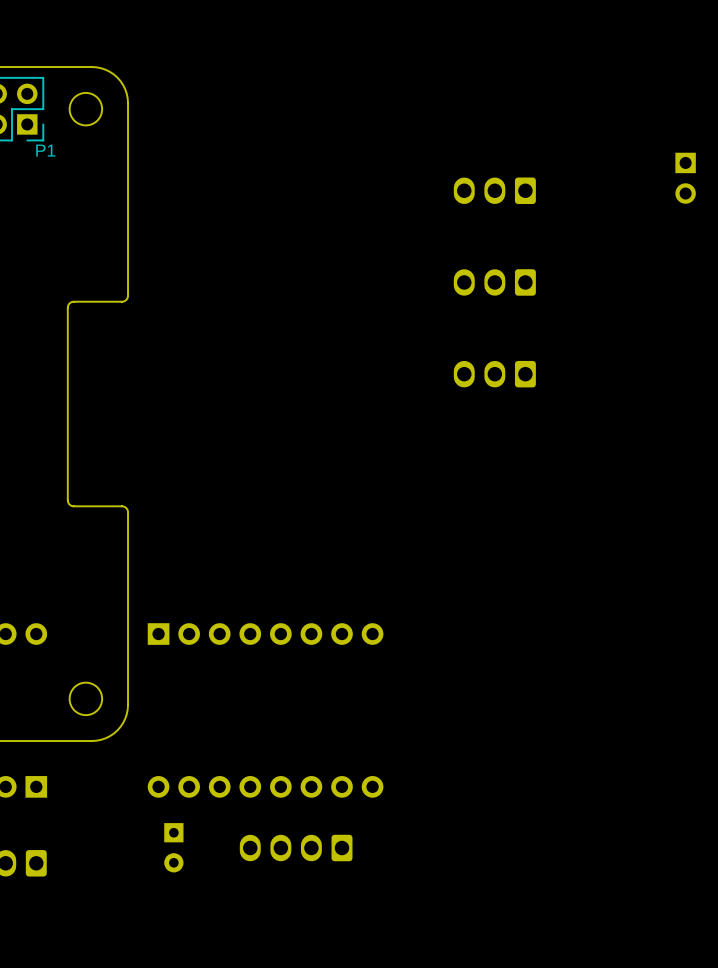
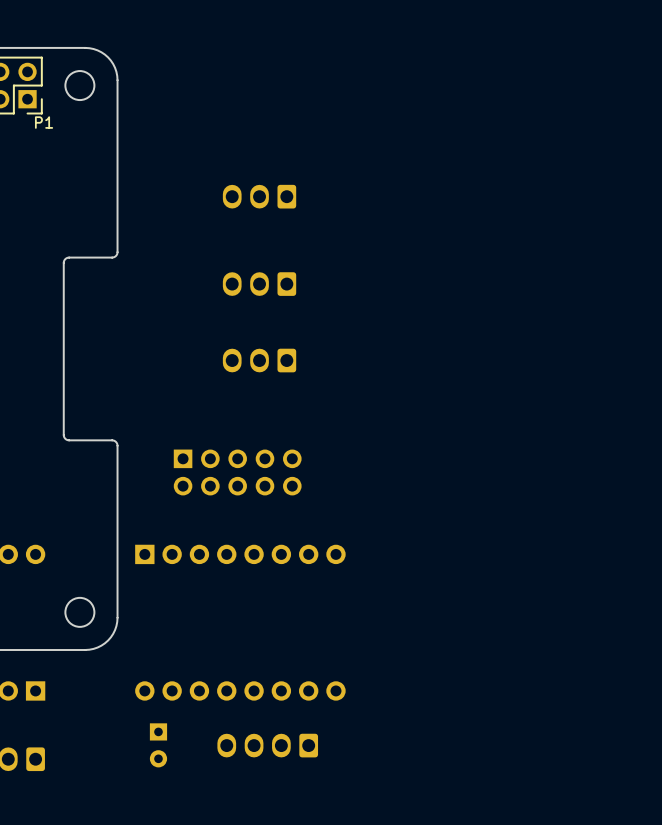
part: (685, 178) -> none
part: (494, 190) -> none
part: none -> (259, 196)
part: (494, 282) -> none
part: none -> (259, 284)
part: (494, 374) -> none
part: none -> (259, 360)
part: none -> (237, 472)

